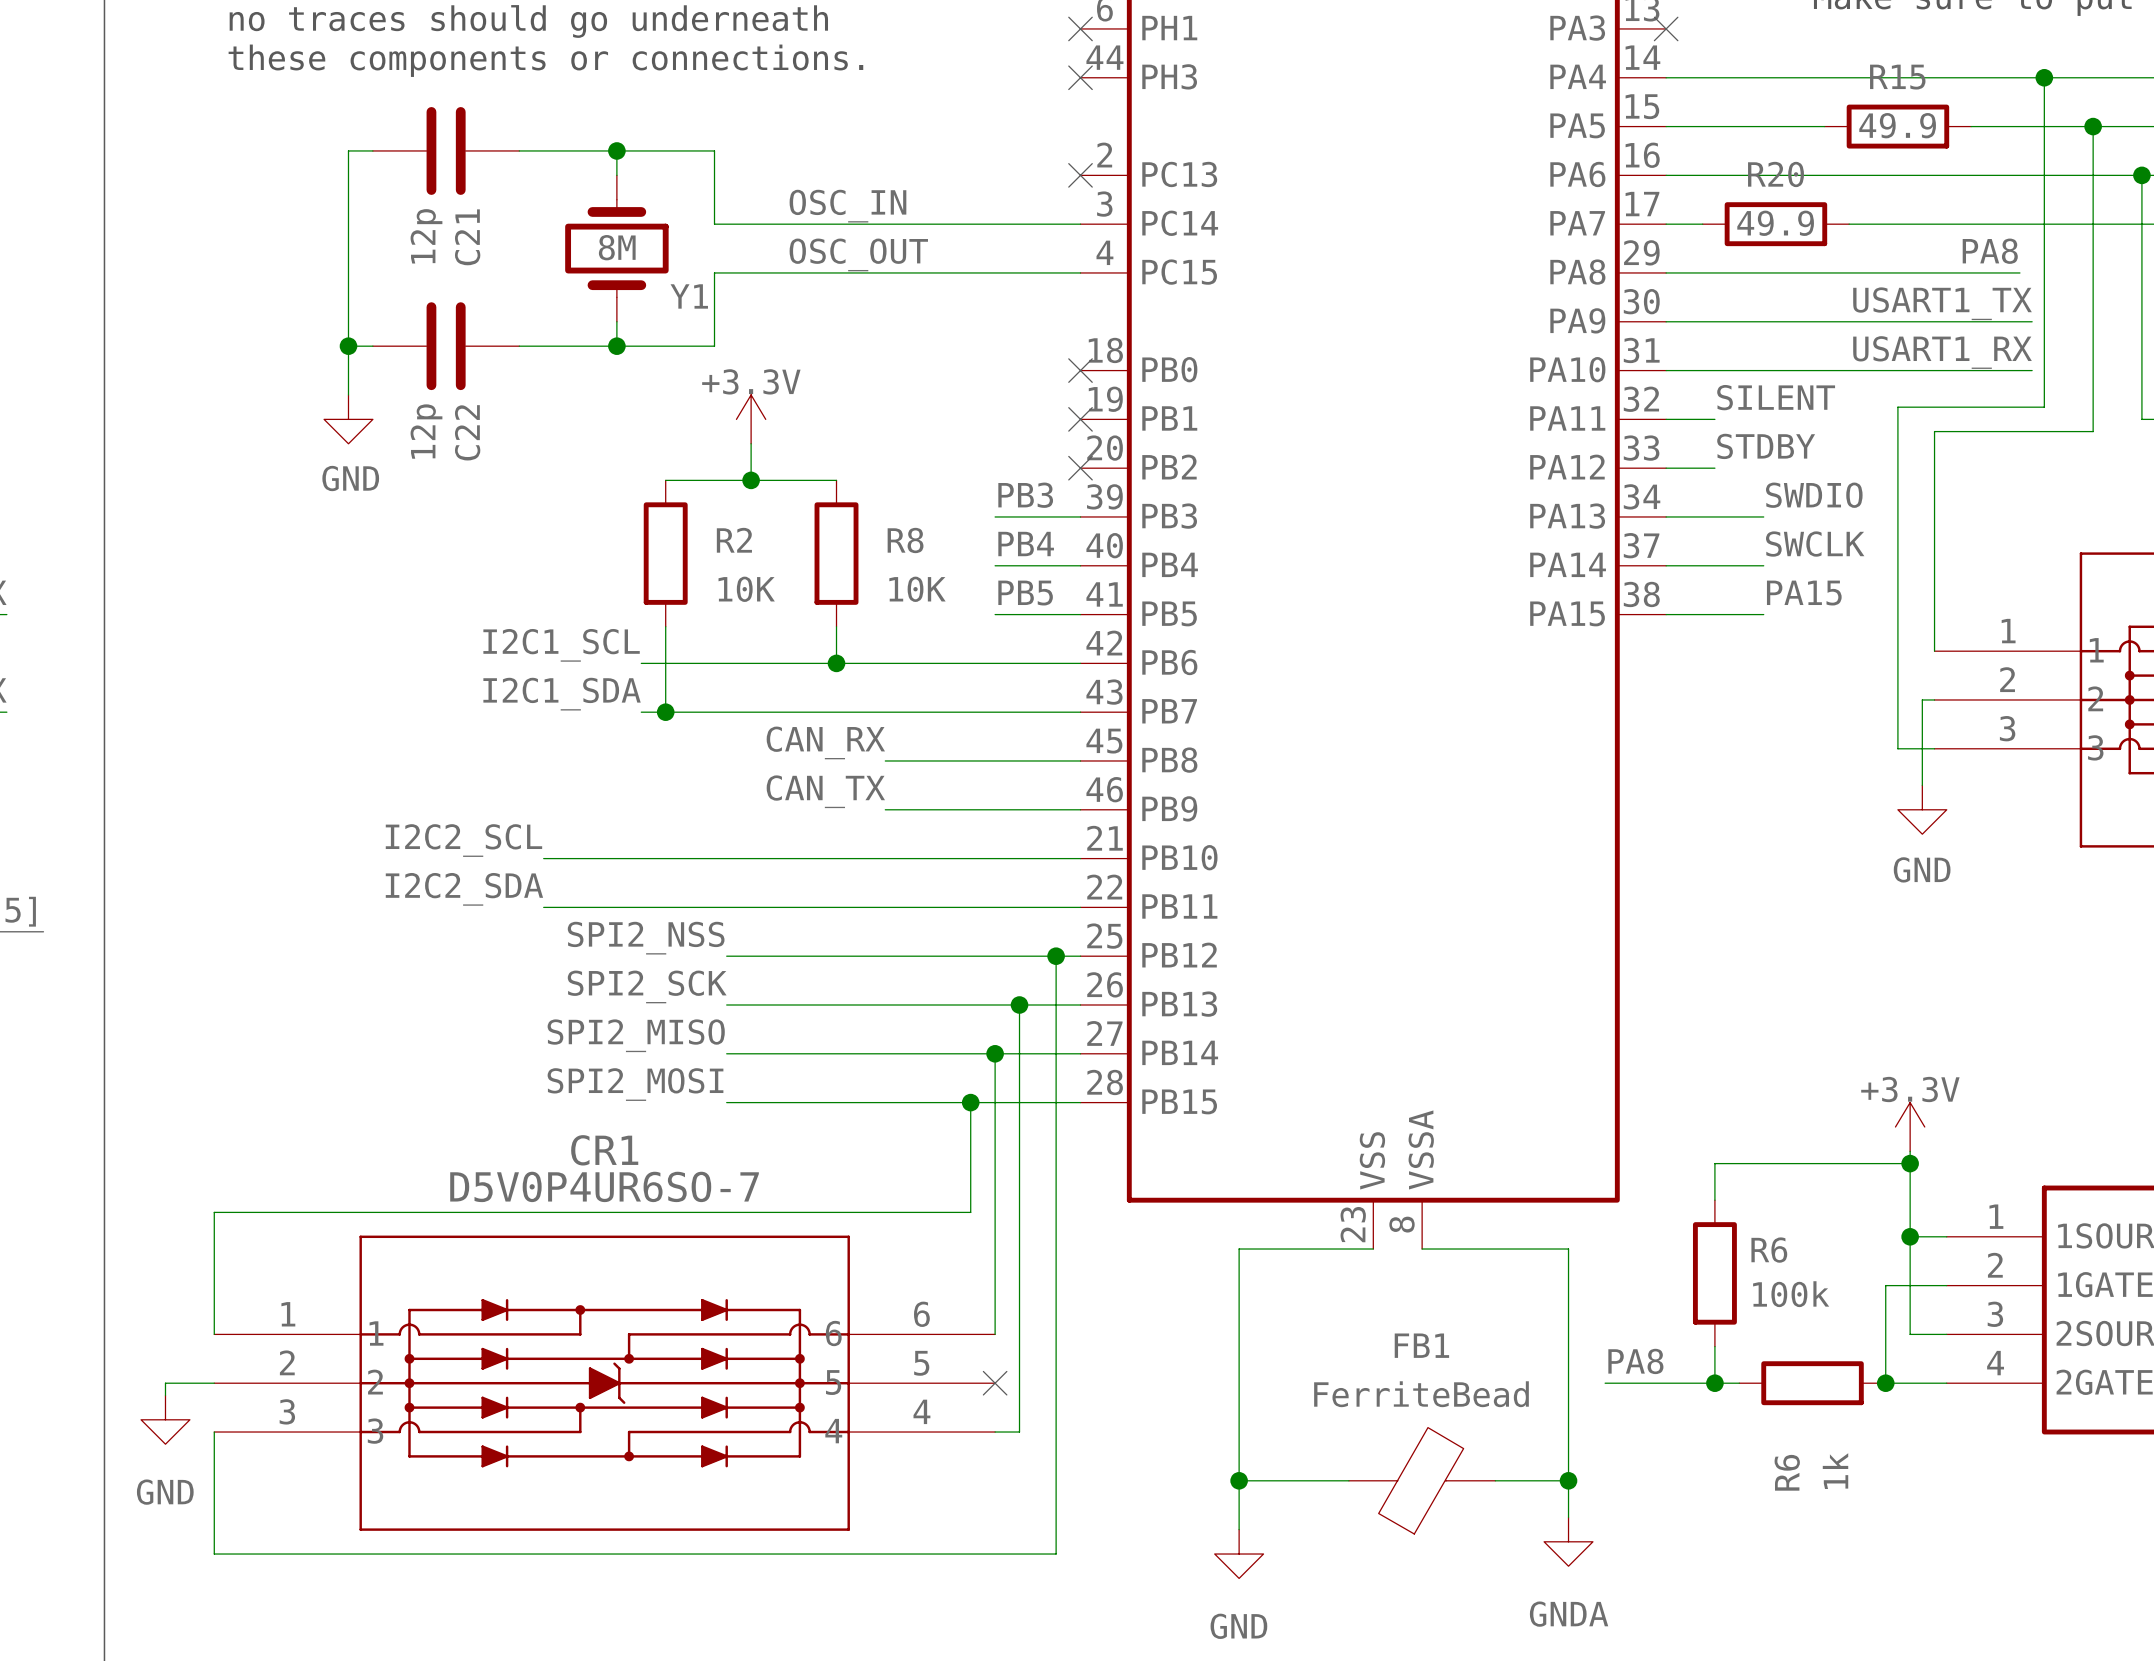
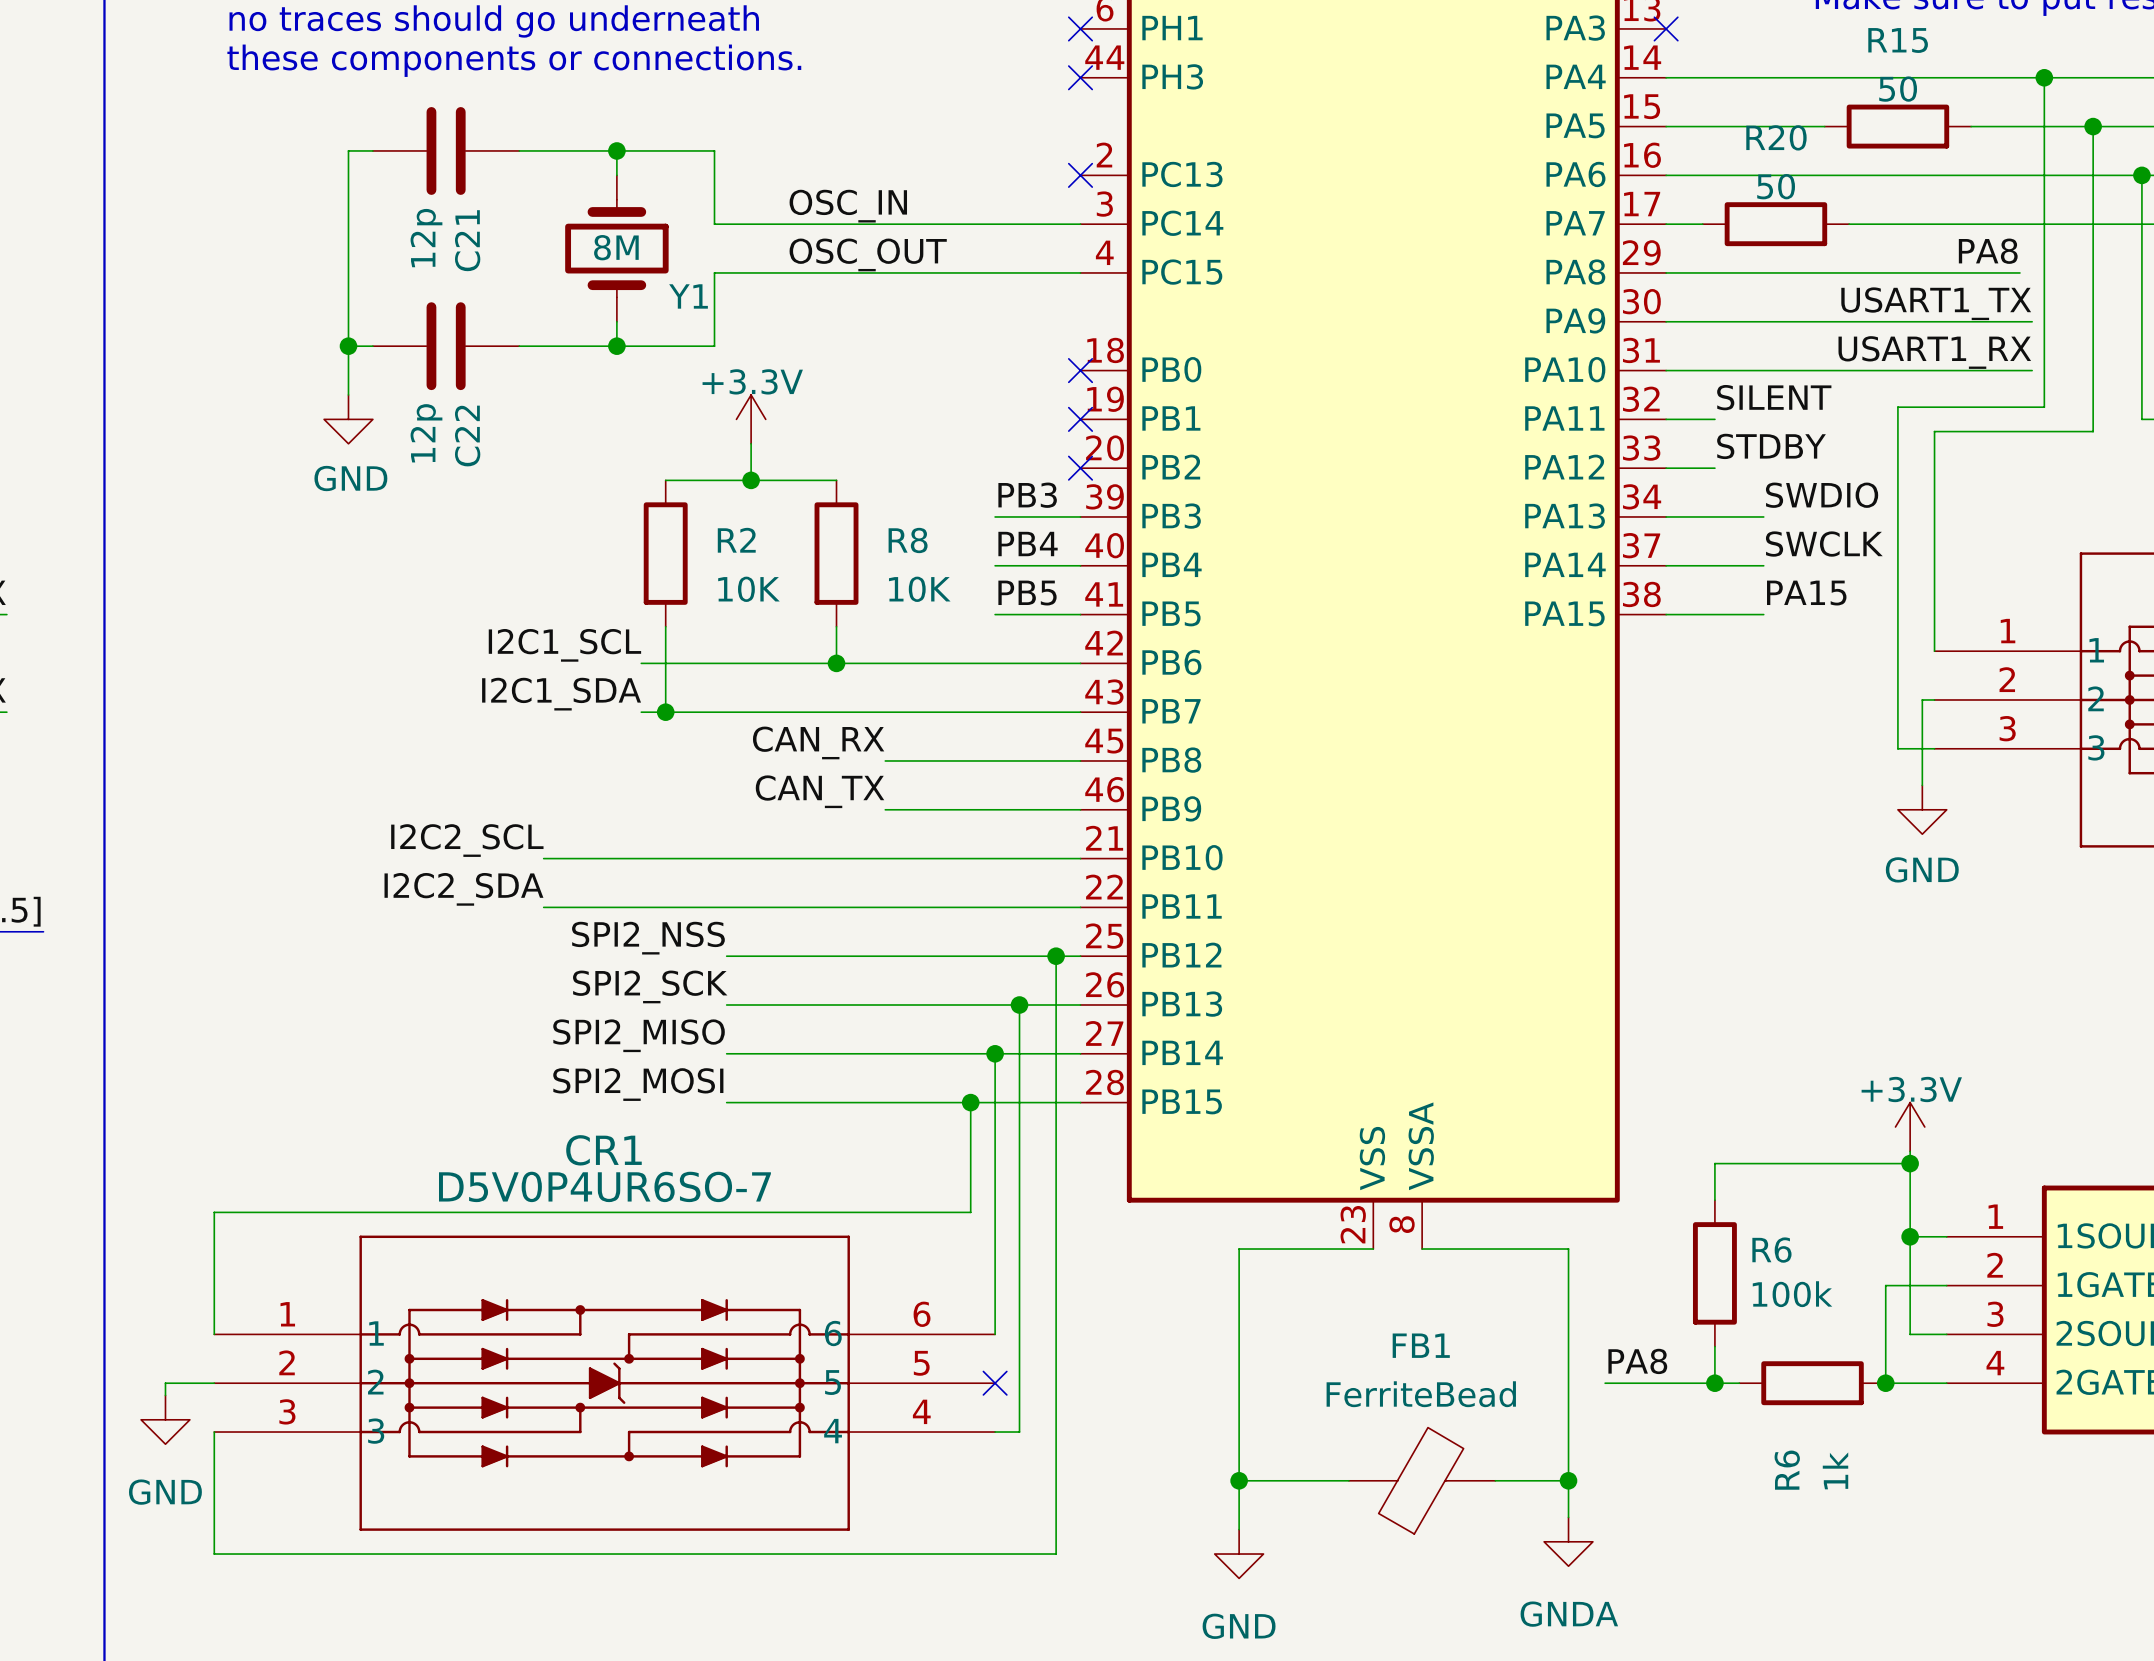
R15 name position: R15 (1897, 77) -> R15 (1898, 40)
R15 value: 49.9 (1897, 125) -> 50 (1898, 89)
R20 name position: R20 (1776, 174) -> R20 (1776, 137)
R20 value: 49.9 (1775, 223) -> 50 (1776, 186)

